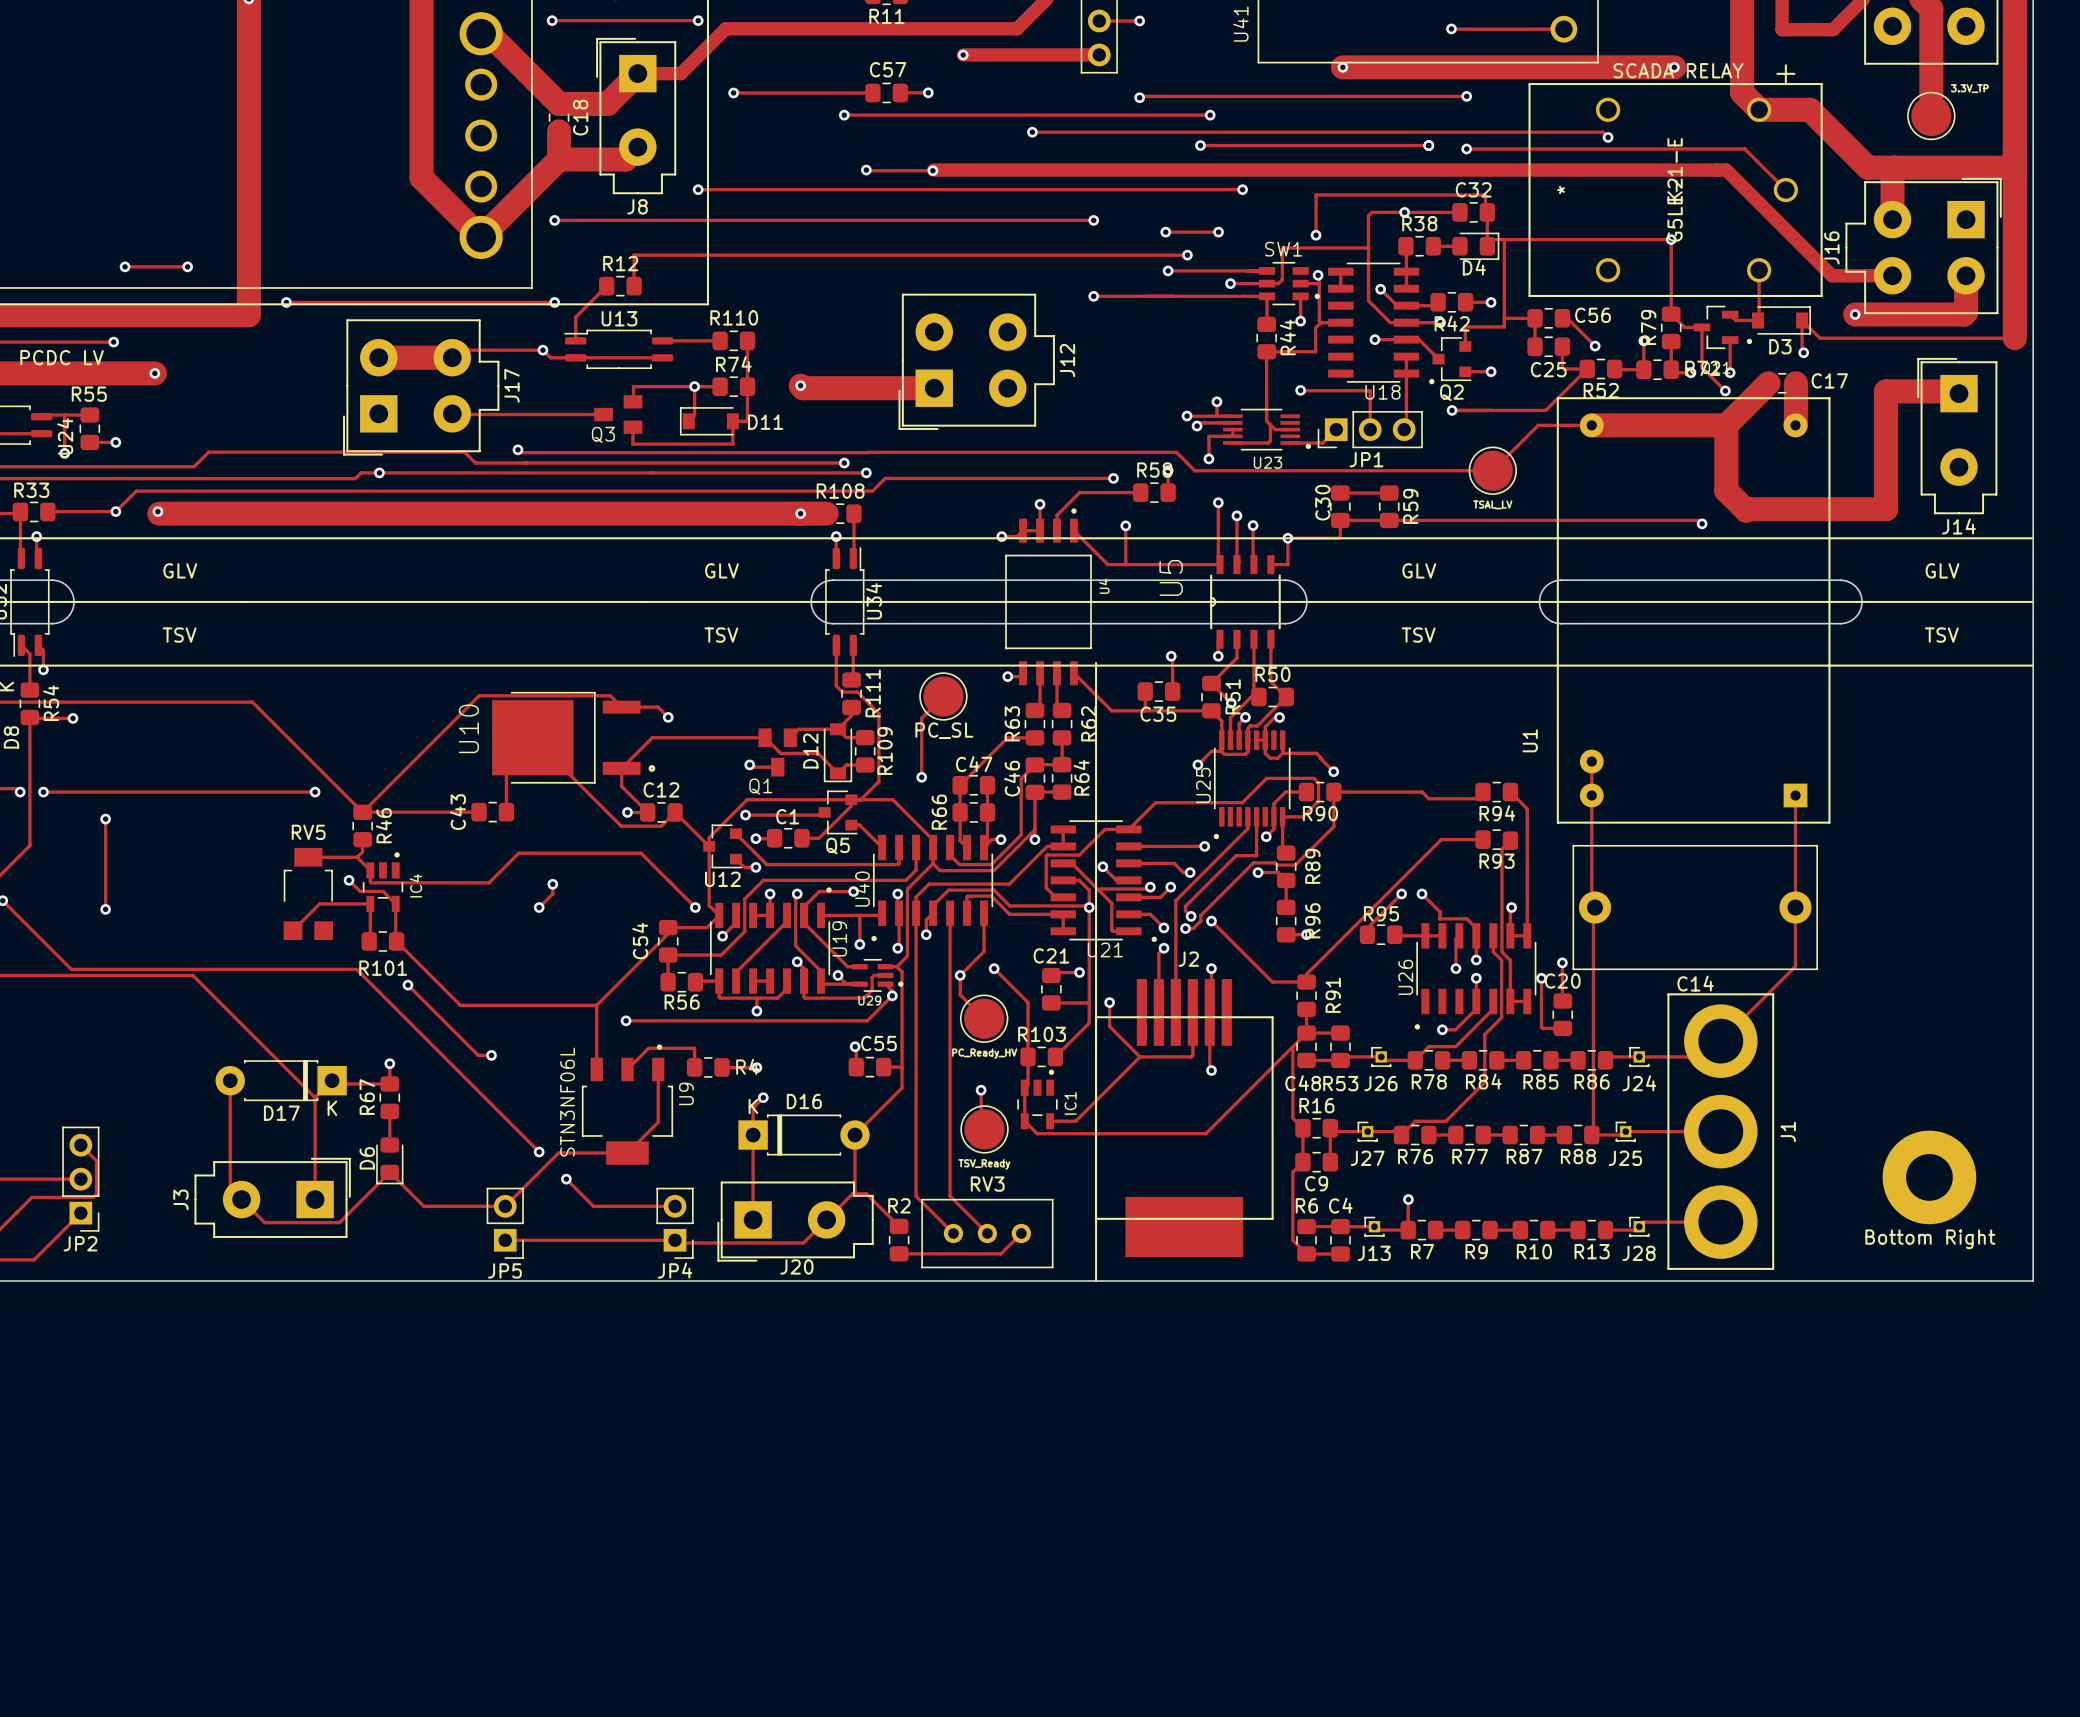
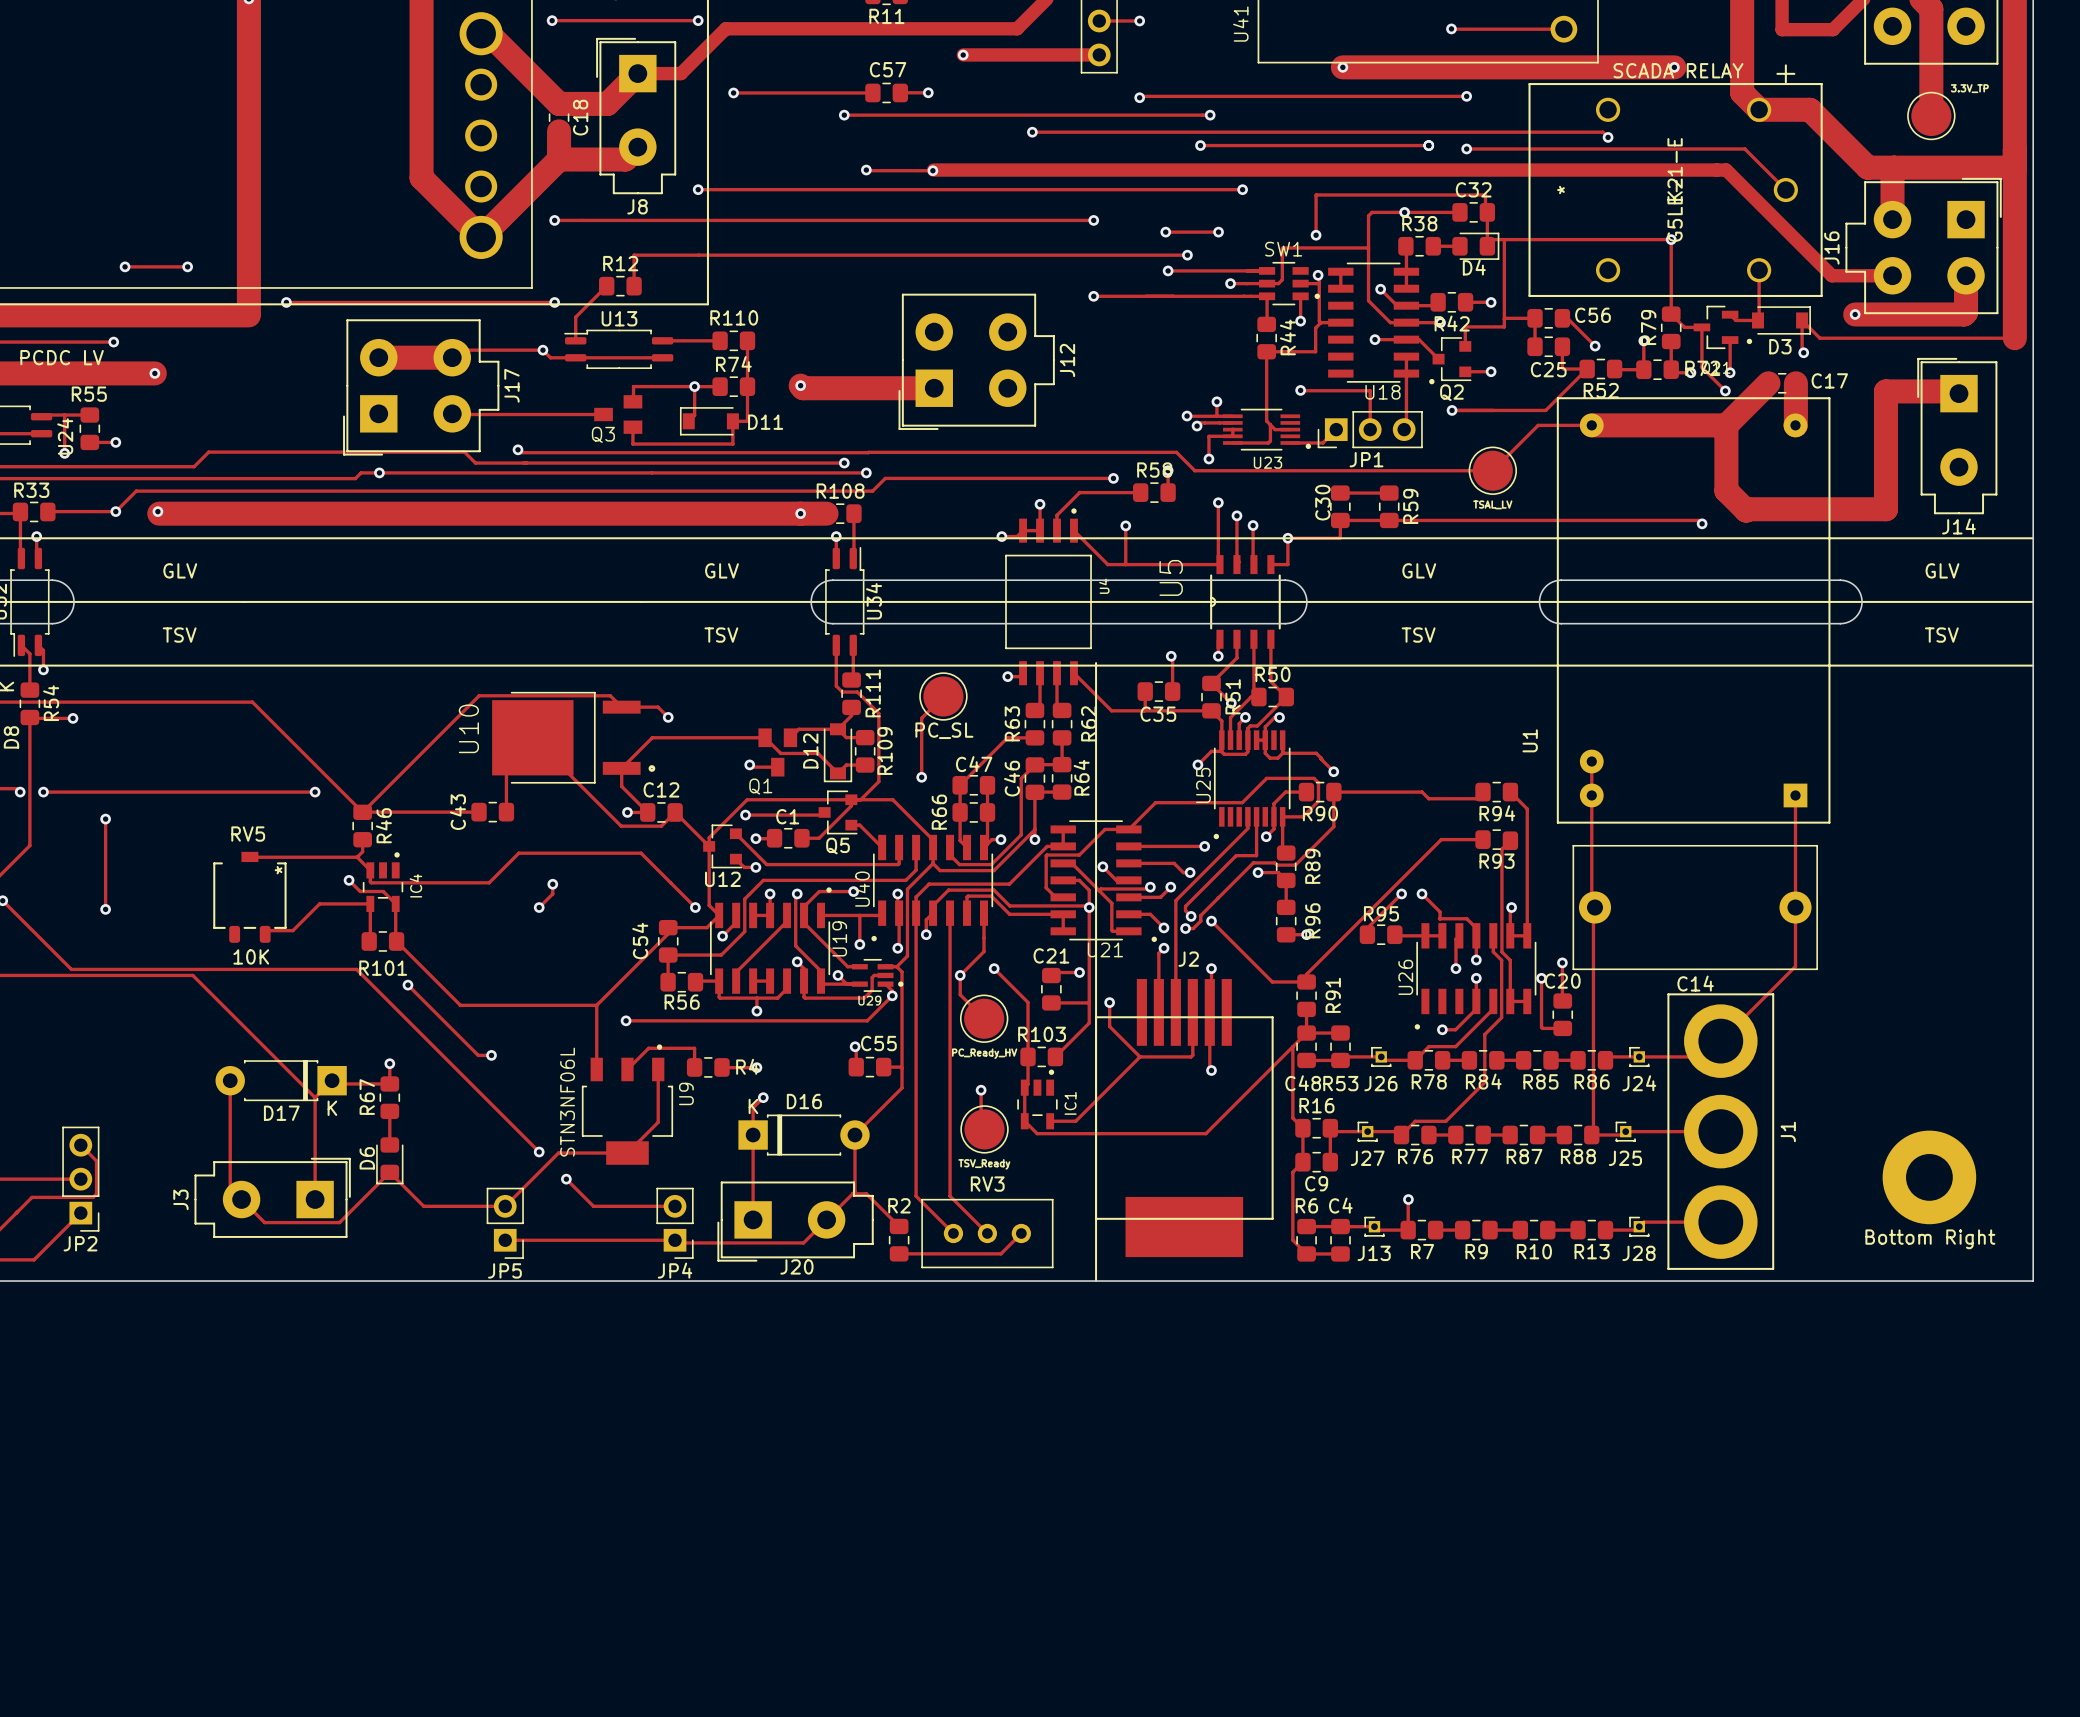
RV5 footprint: [283, 847, 334, 940] -> [213, 851, 287, 943]
track: none -> (249, 856) (308, 857)
track: none -> (292, 930) (268, 930) (265, 934)
RV5 value: none -> 10K (251, 956)

